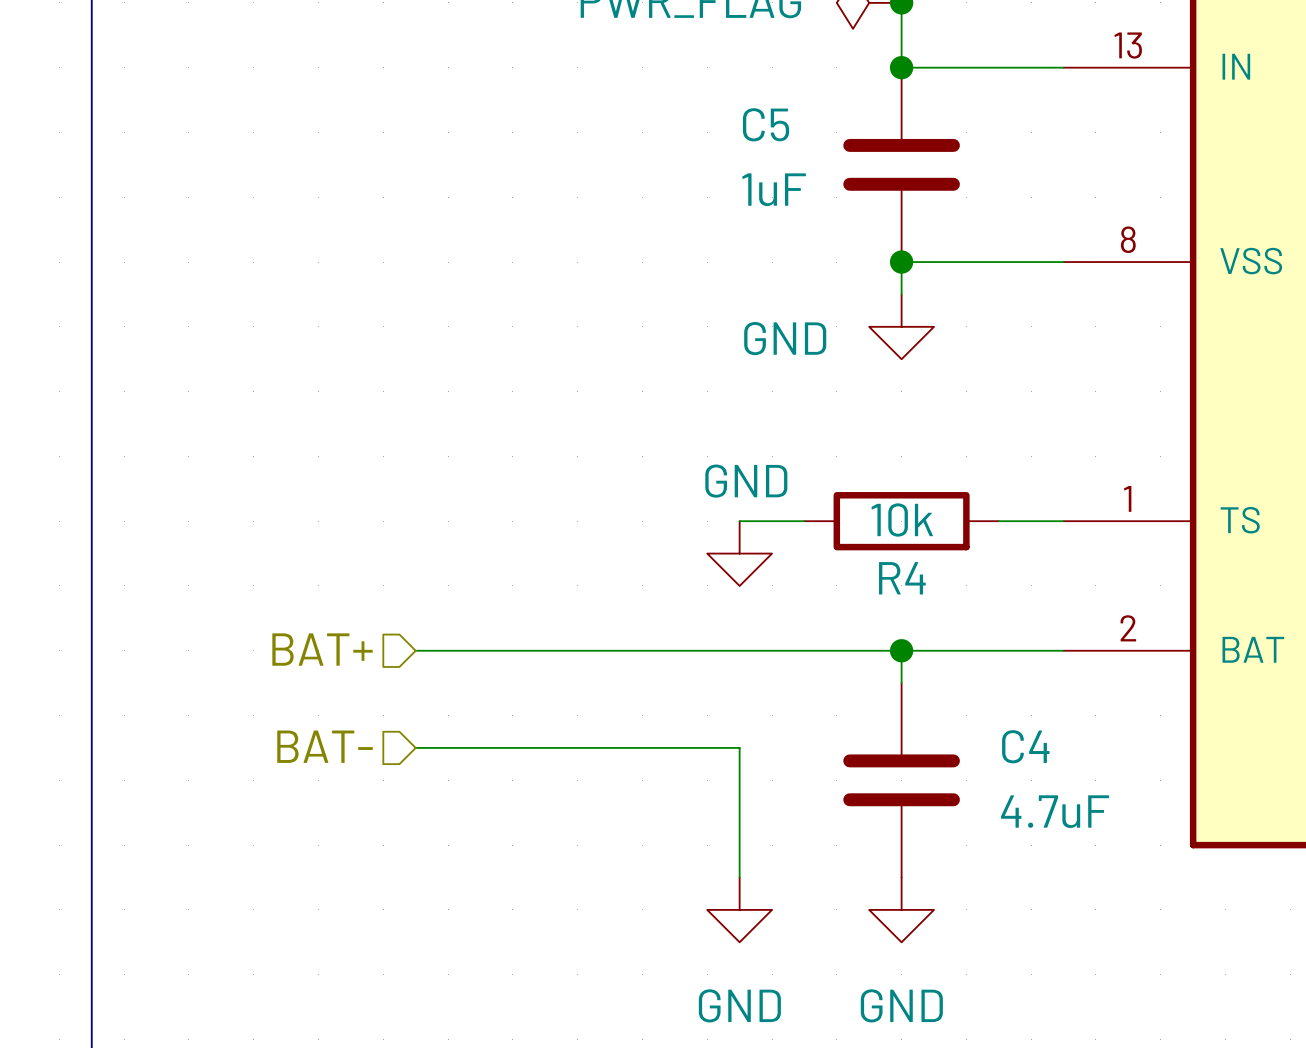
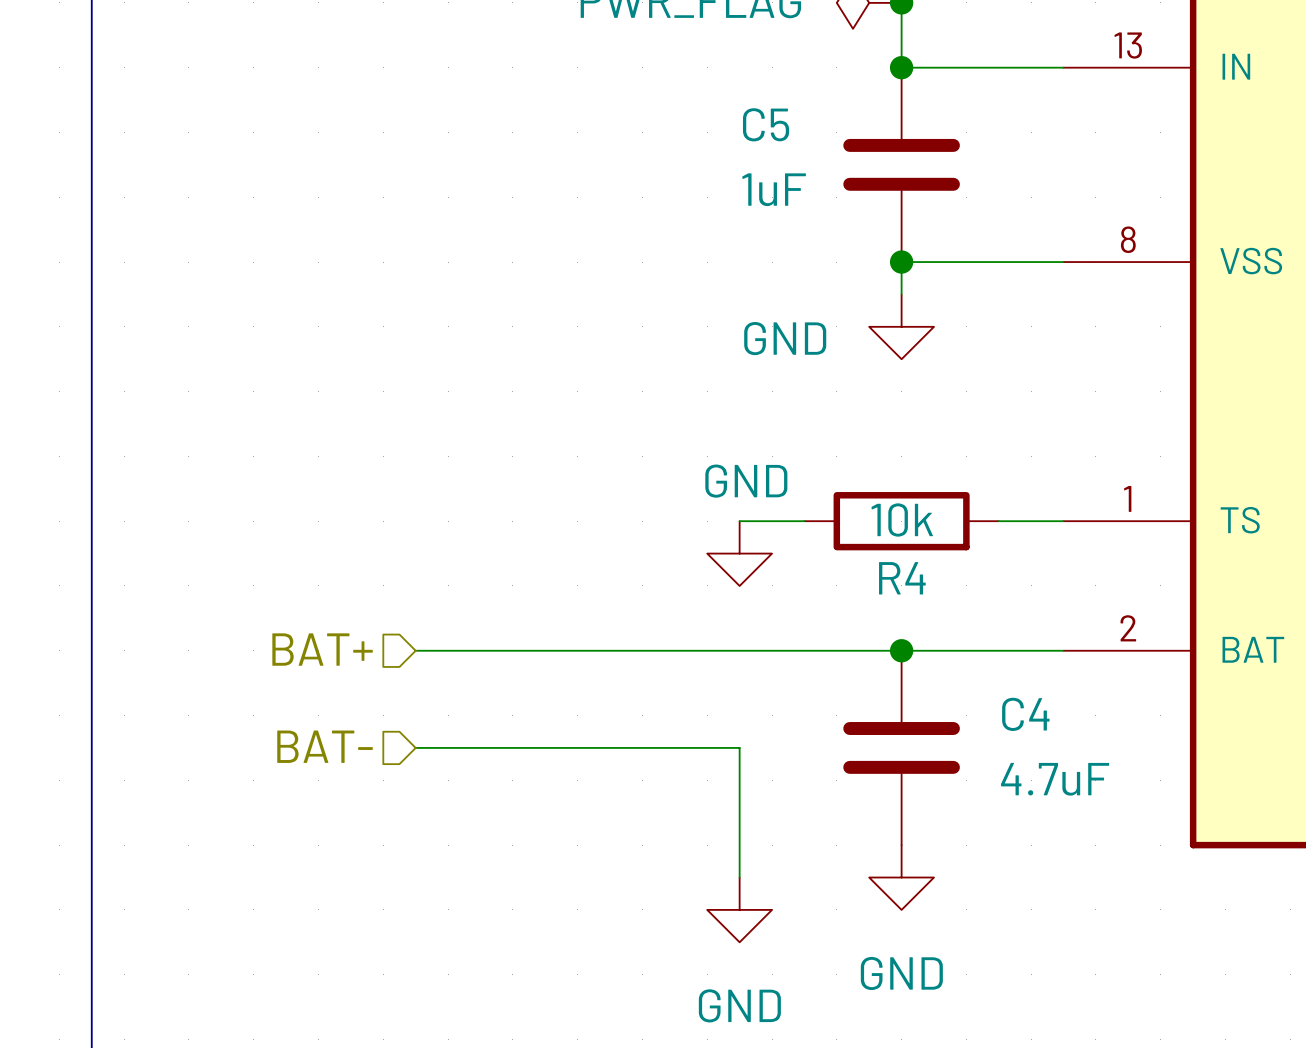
C4 position: (901, 780) -> (901, 747)
power symbol position: GND (901, 909) -> GND (901, 877)

